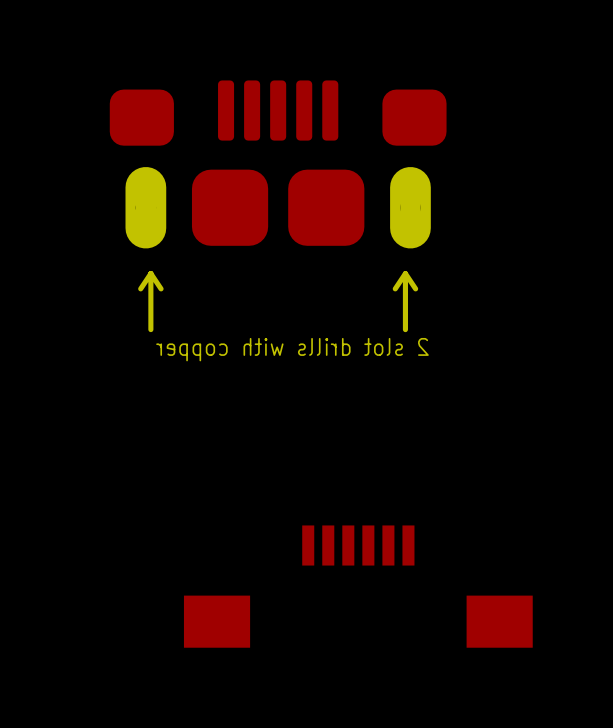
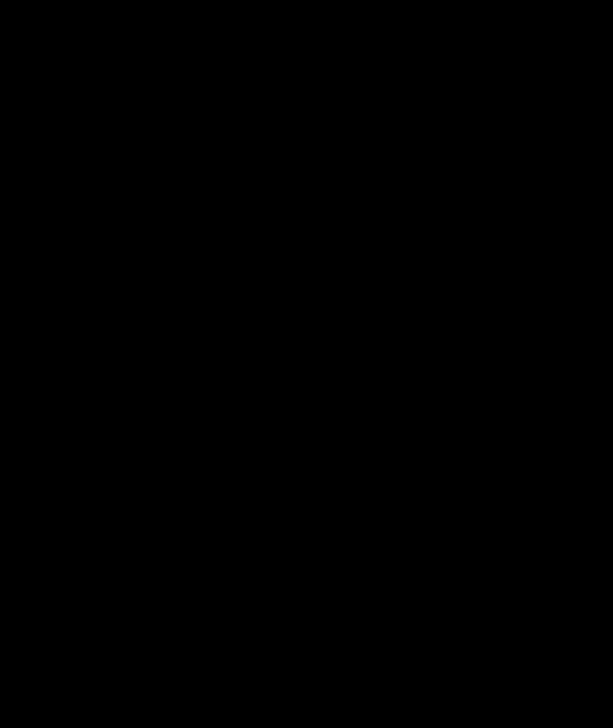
part: (278, 206) -> none
part: (358, 586) -> none

